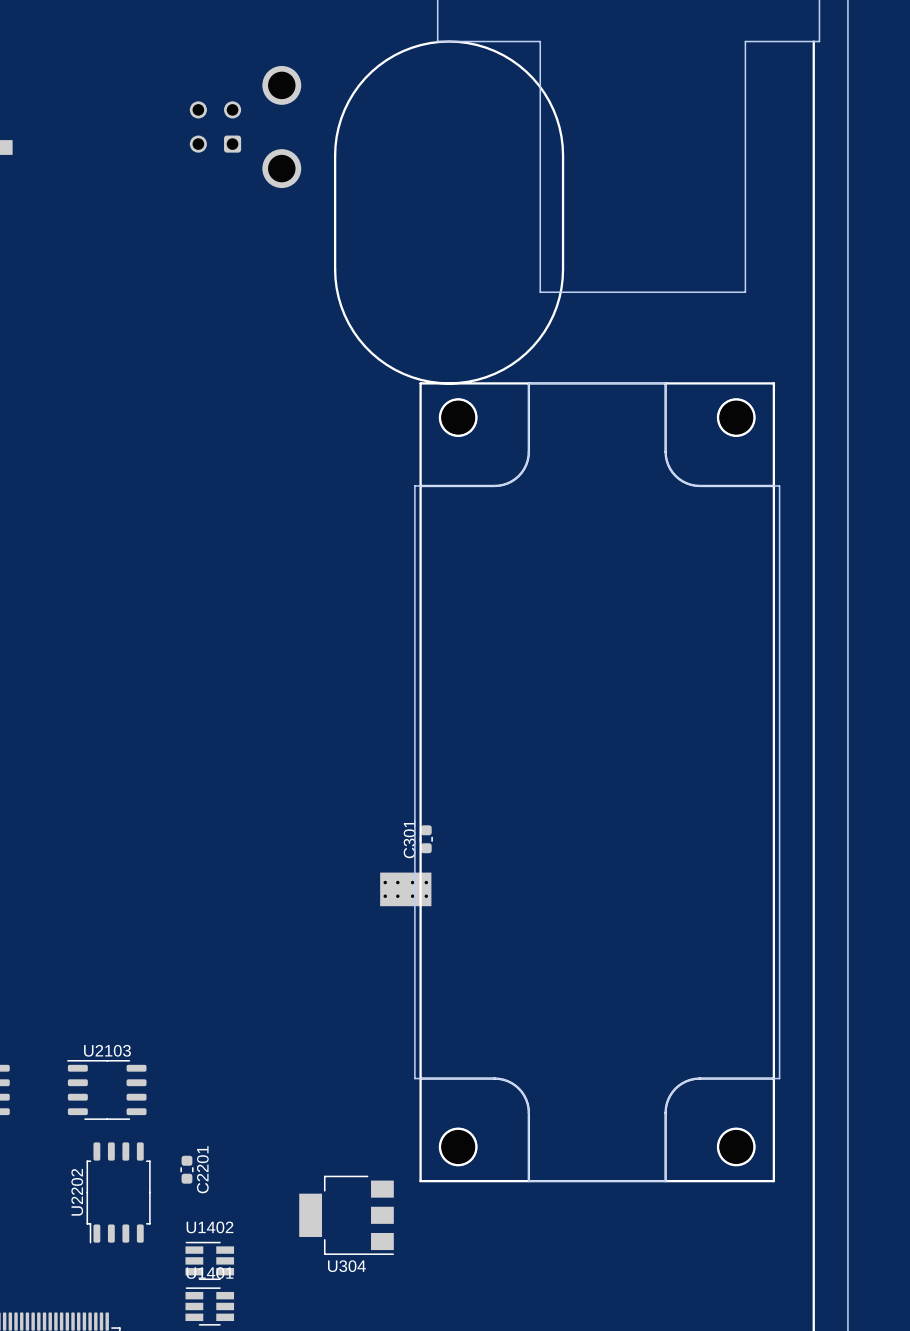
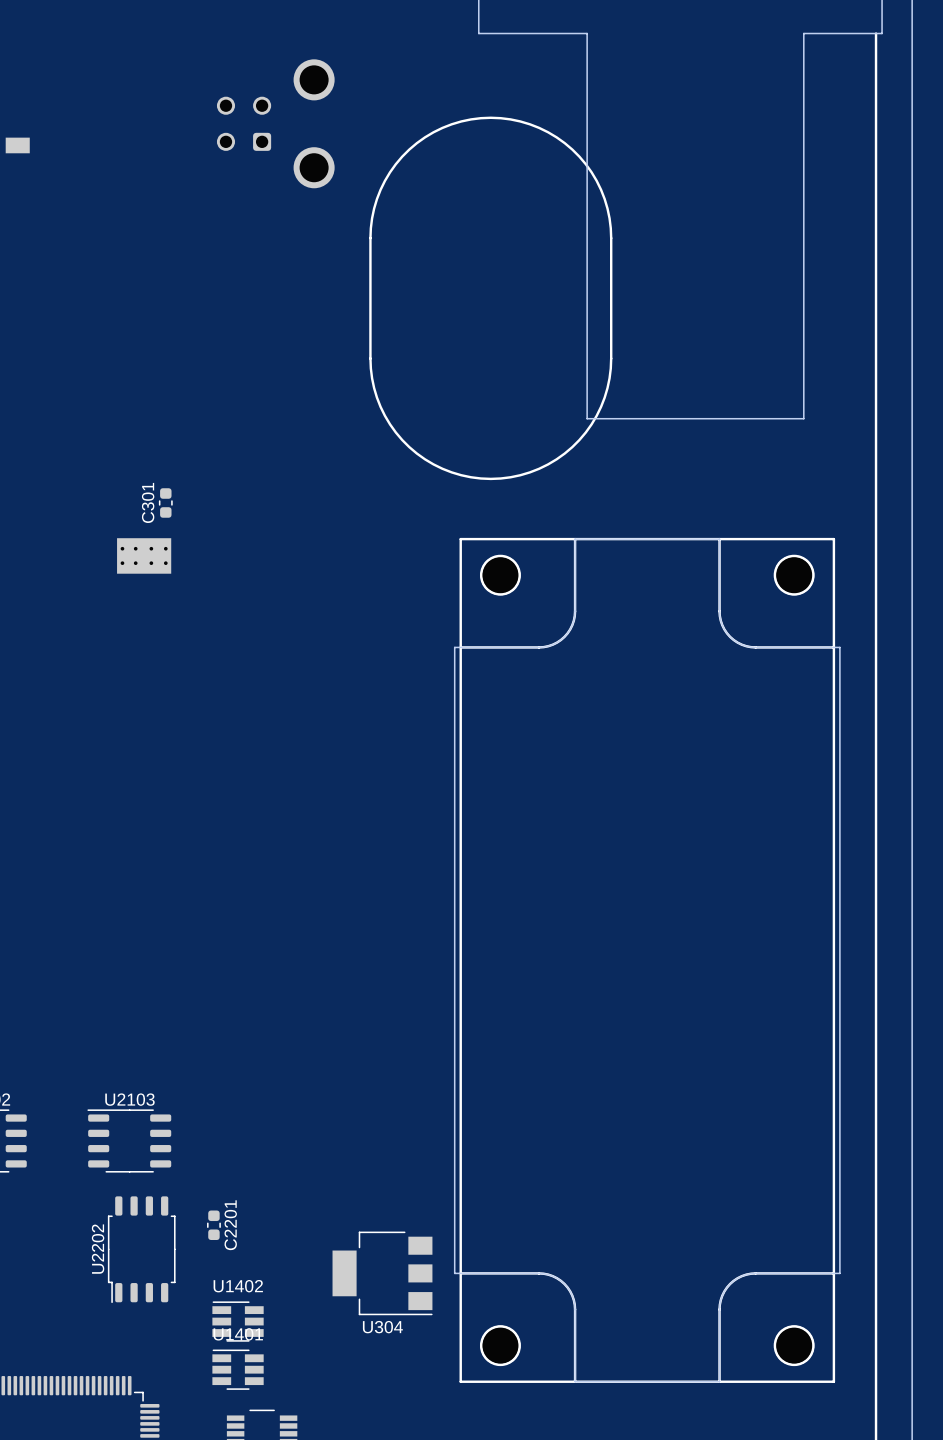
drawing position: (449, 212) -> (490, 298)
board edge: (540, 292) (745, 292) -> (587, 298) (587, 418) (803, 418) (803, 298)
part: none -> (144, 555)
part position: (597, 782) -> (647, 960)
C301 position: (426, 839) -> (165, 502)
part: (405, 889) -> none

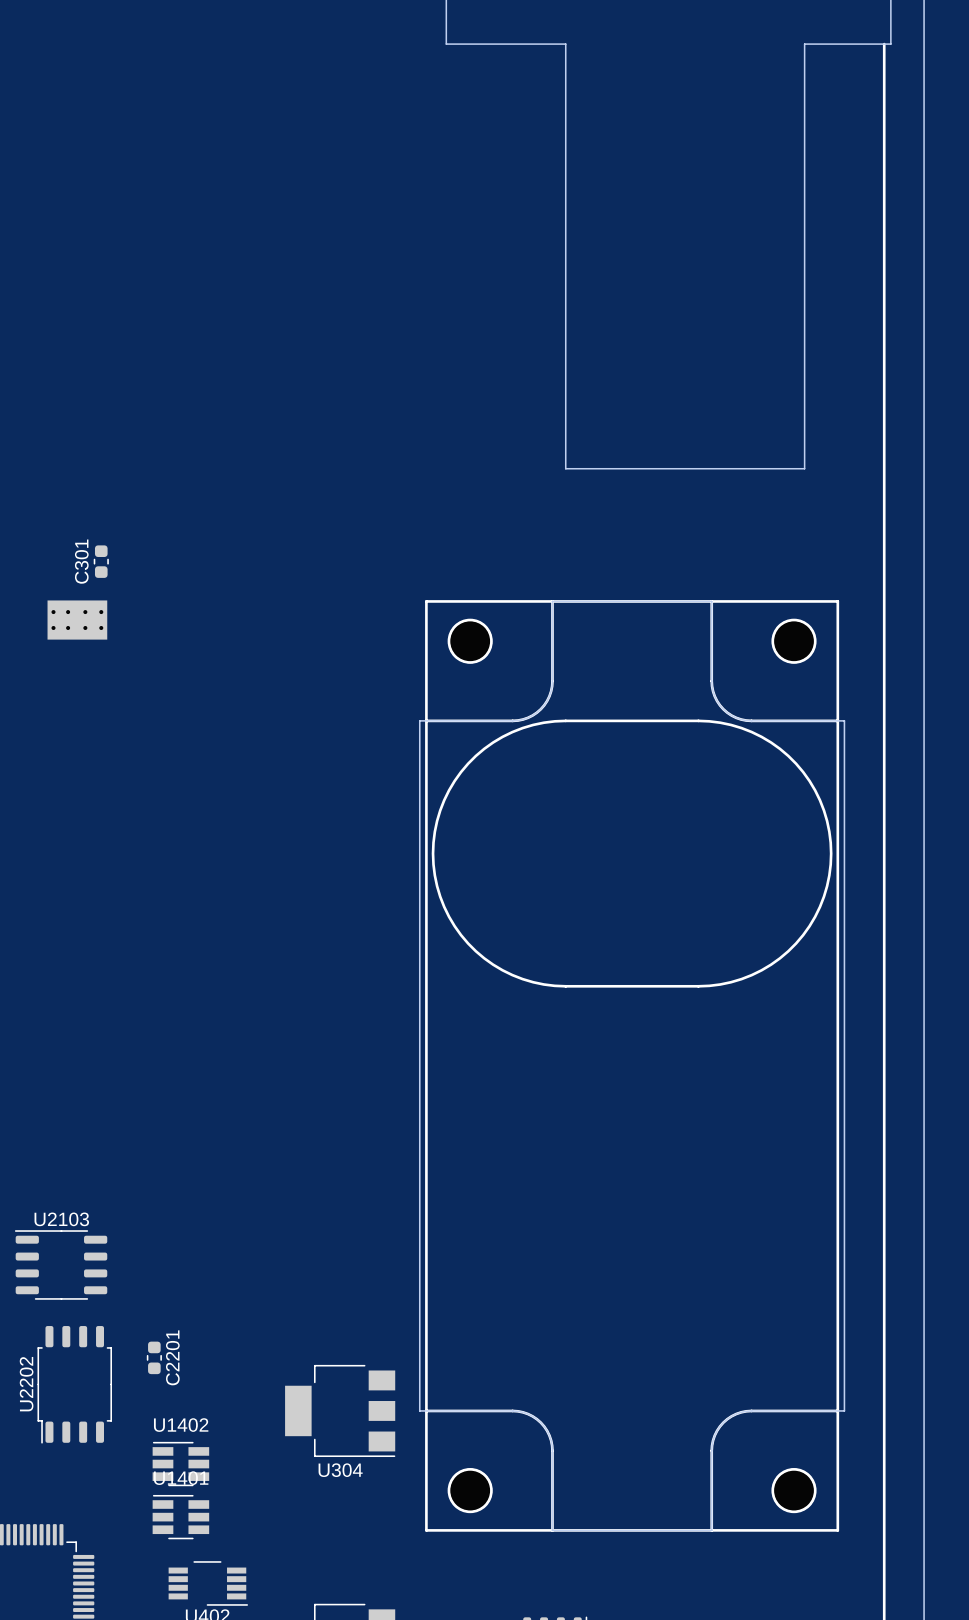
drawing: [369, 116, 613, 481] -> none
part: (275, 123) -> none
drawing: none -> [431, 719, 833, 988]

